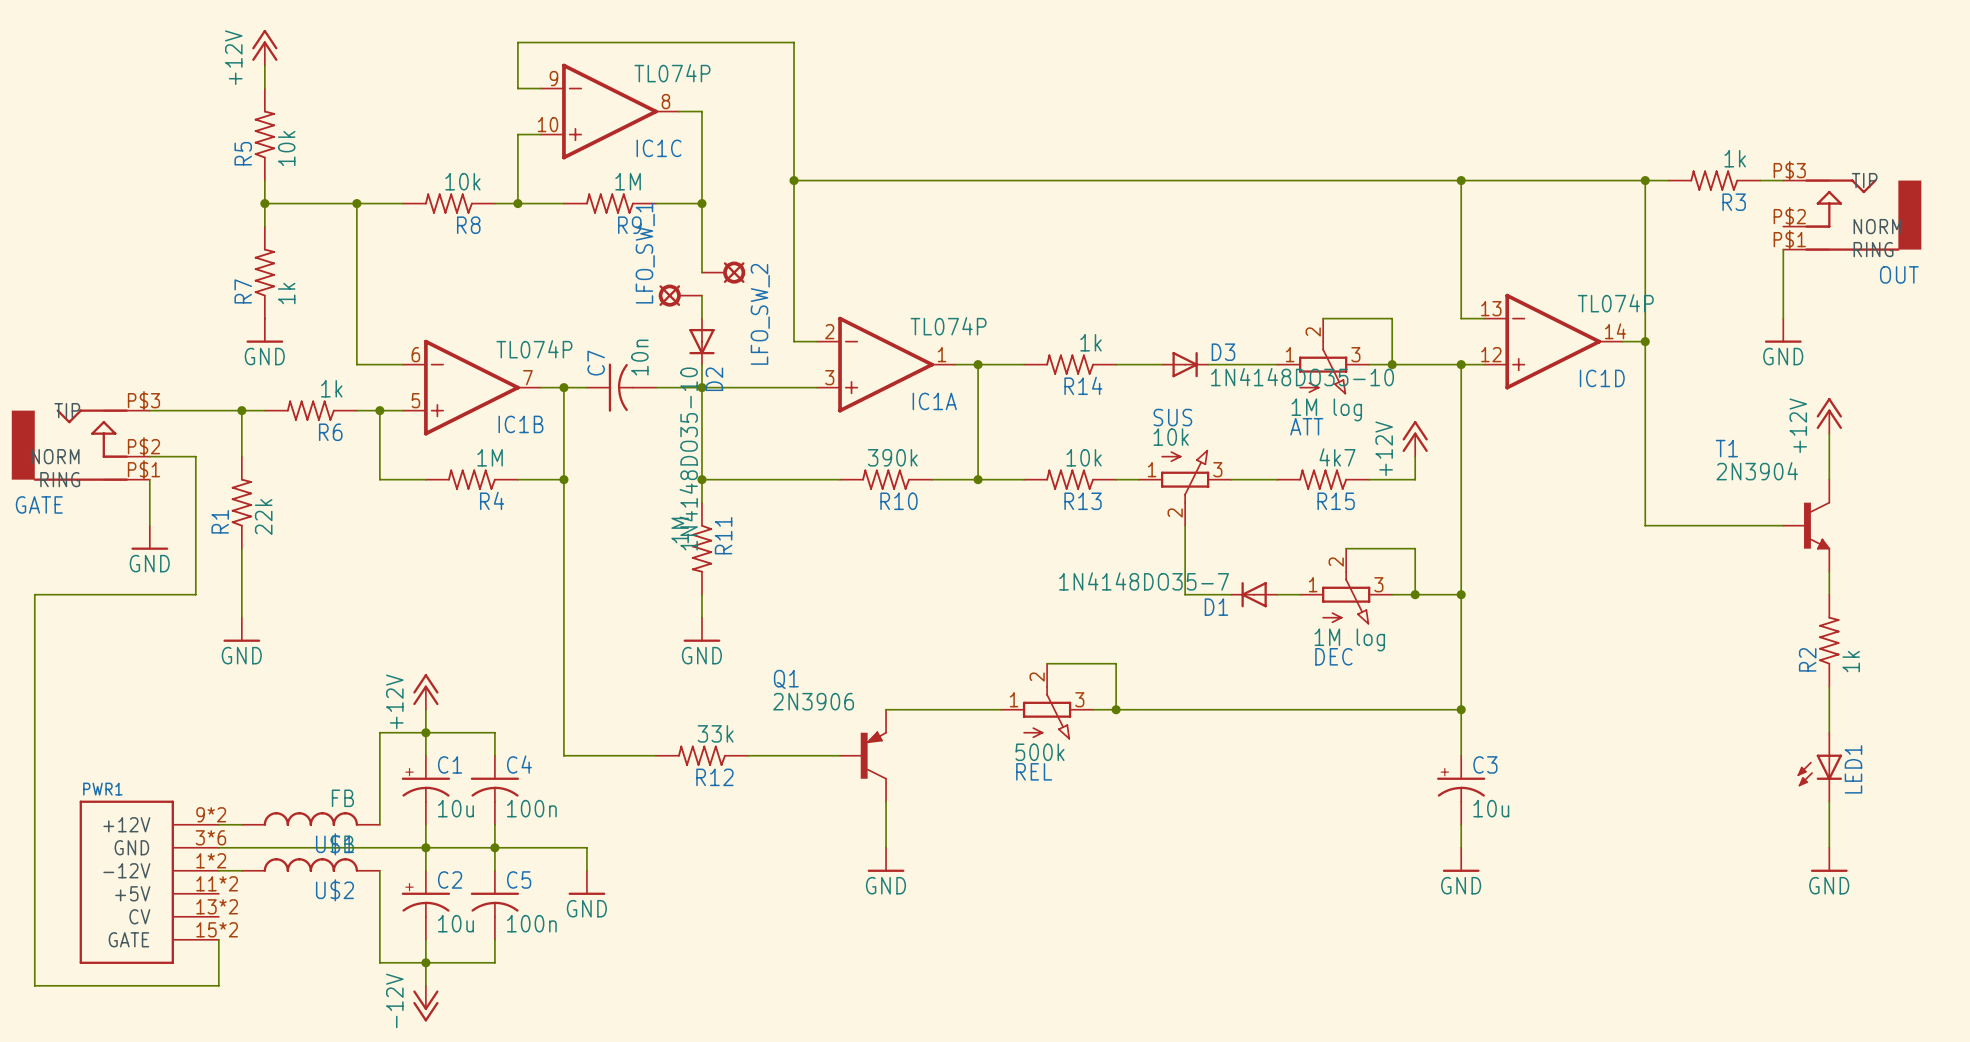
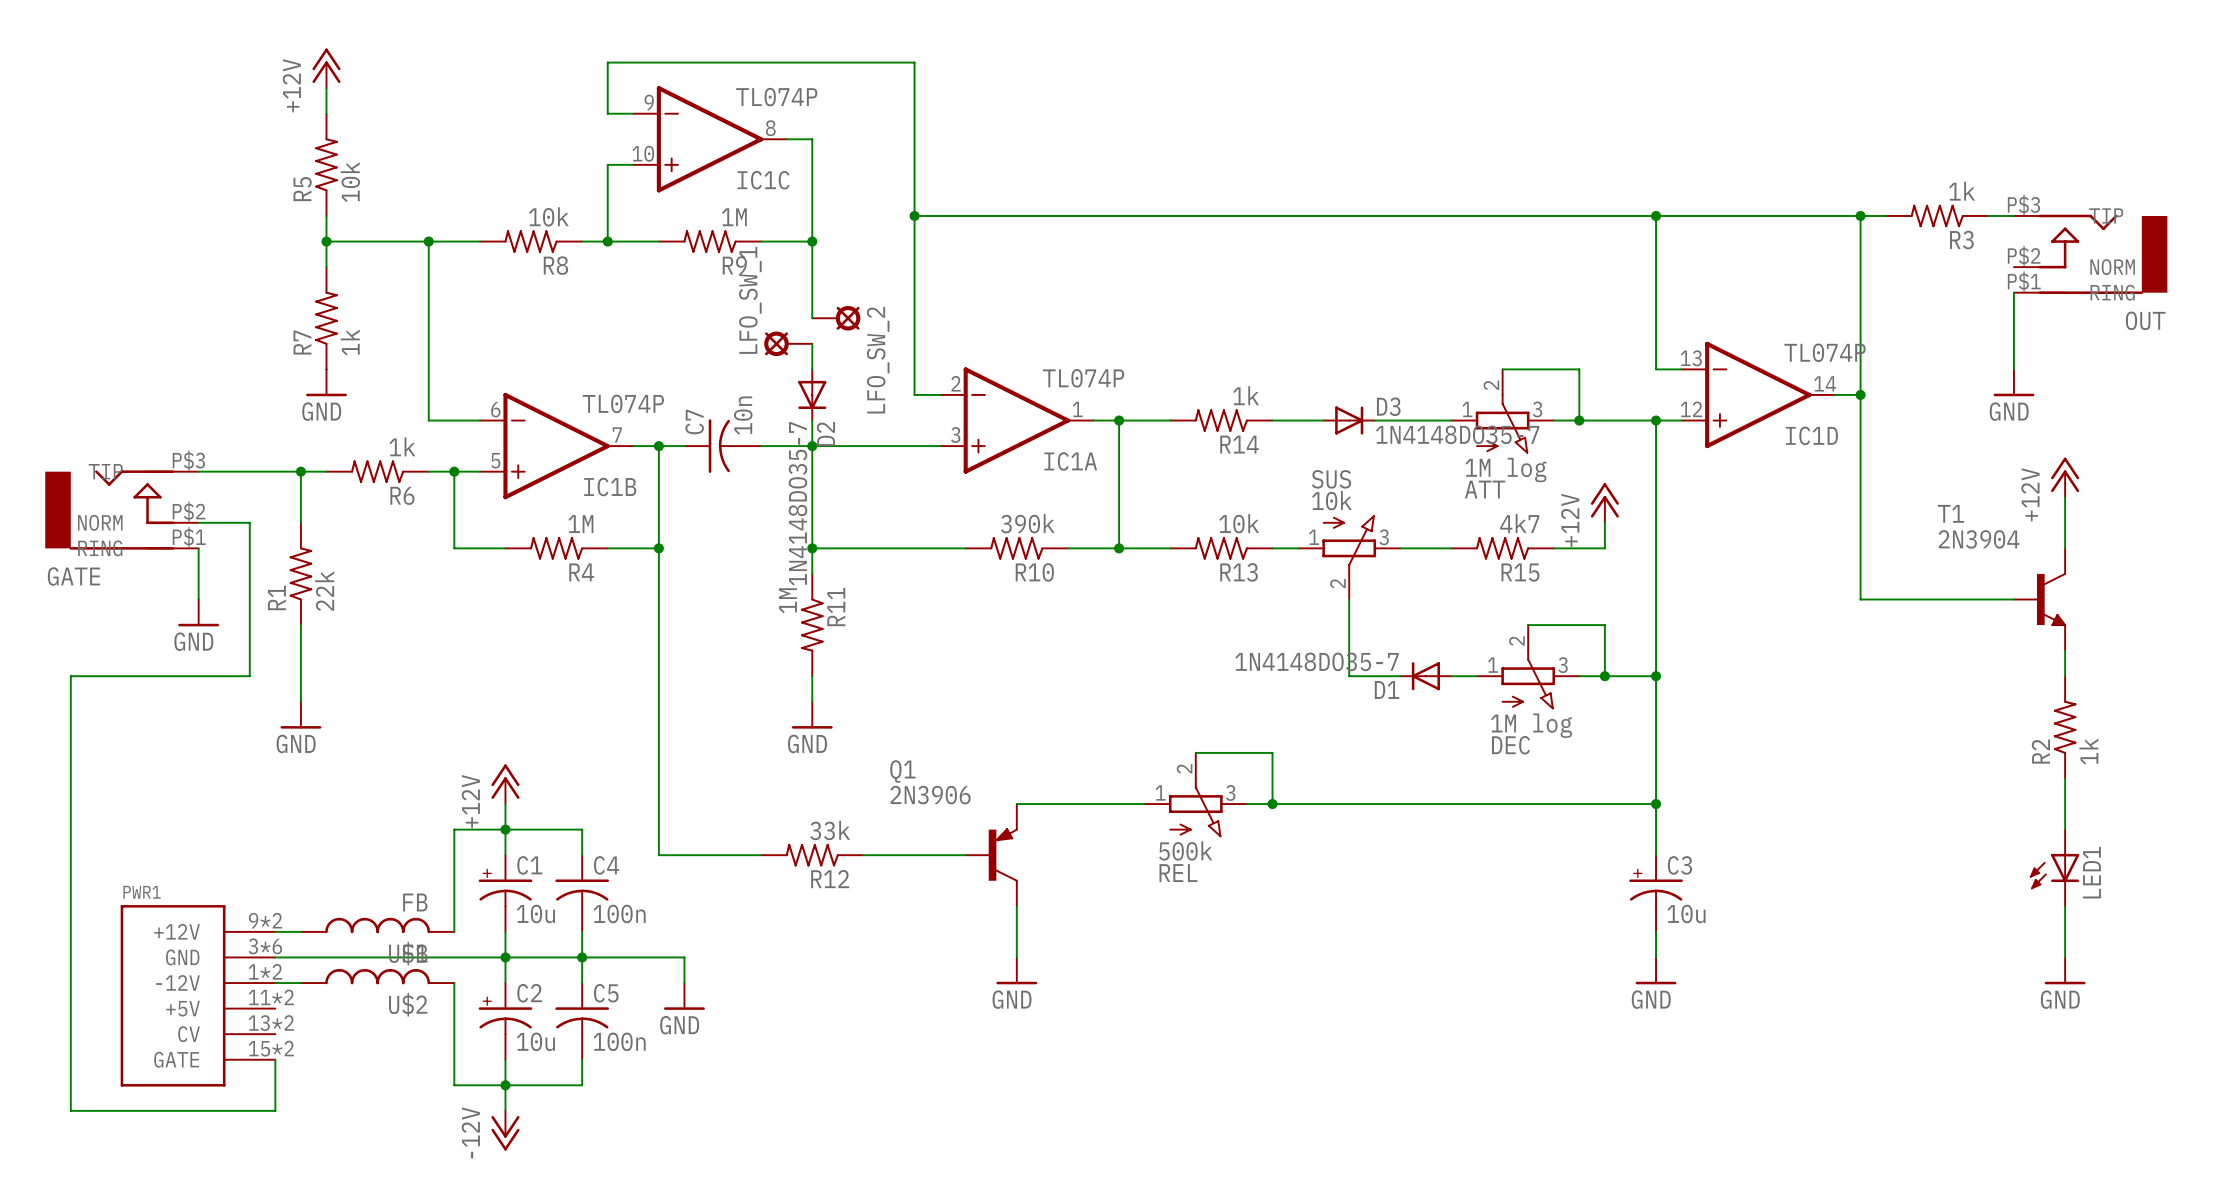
D3 value: 1N4148DO35-10 (1302, 377) -> 1N4148DO35-7 (1457, 434)
D2 value: 1N4148DO35-10 (688, 458) -> 1N4148DO35-7 (797, 503)

